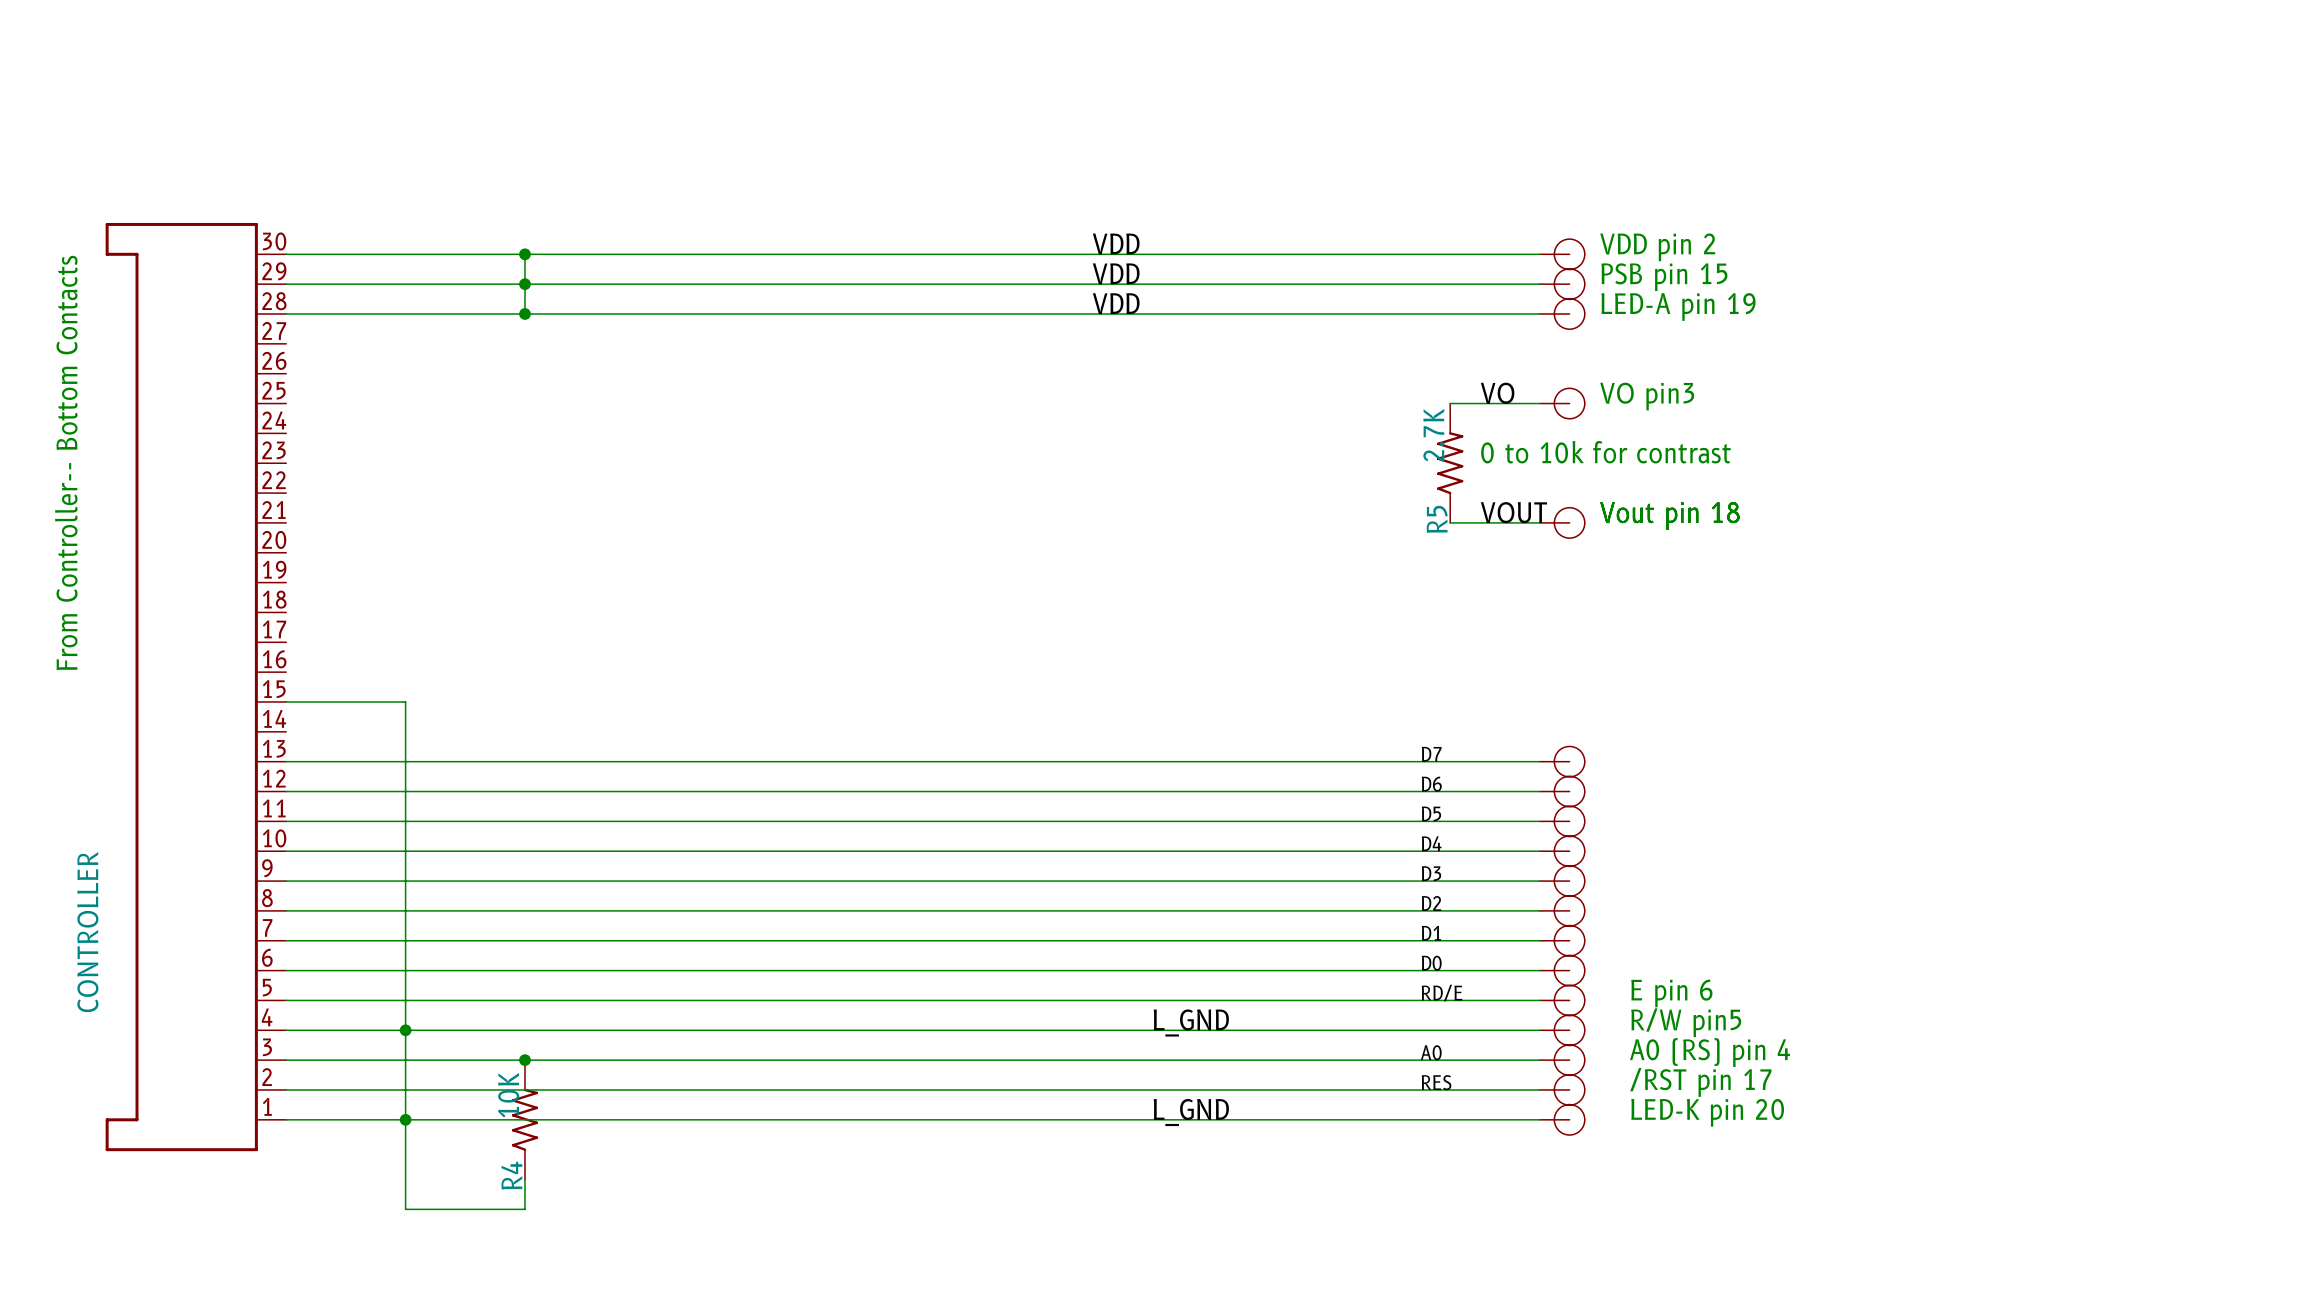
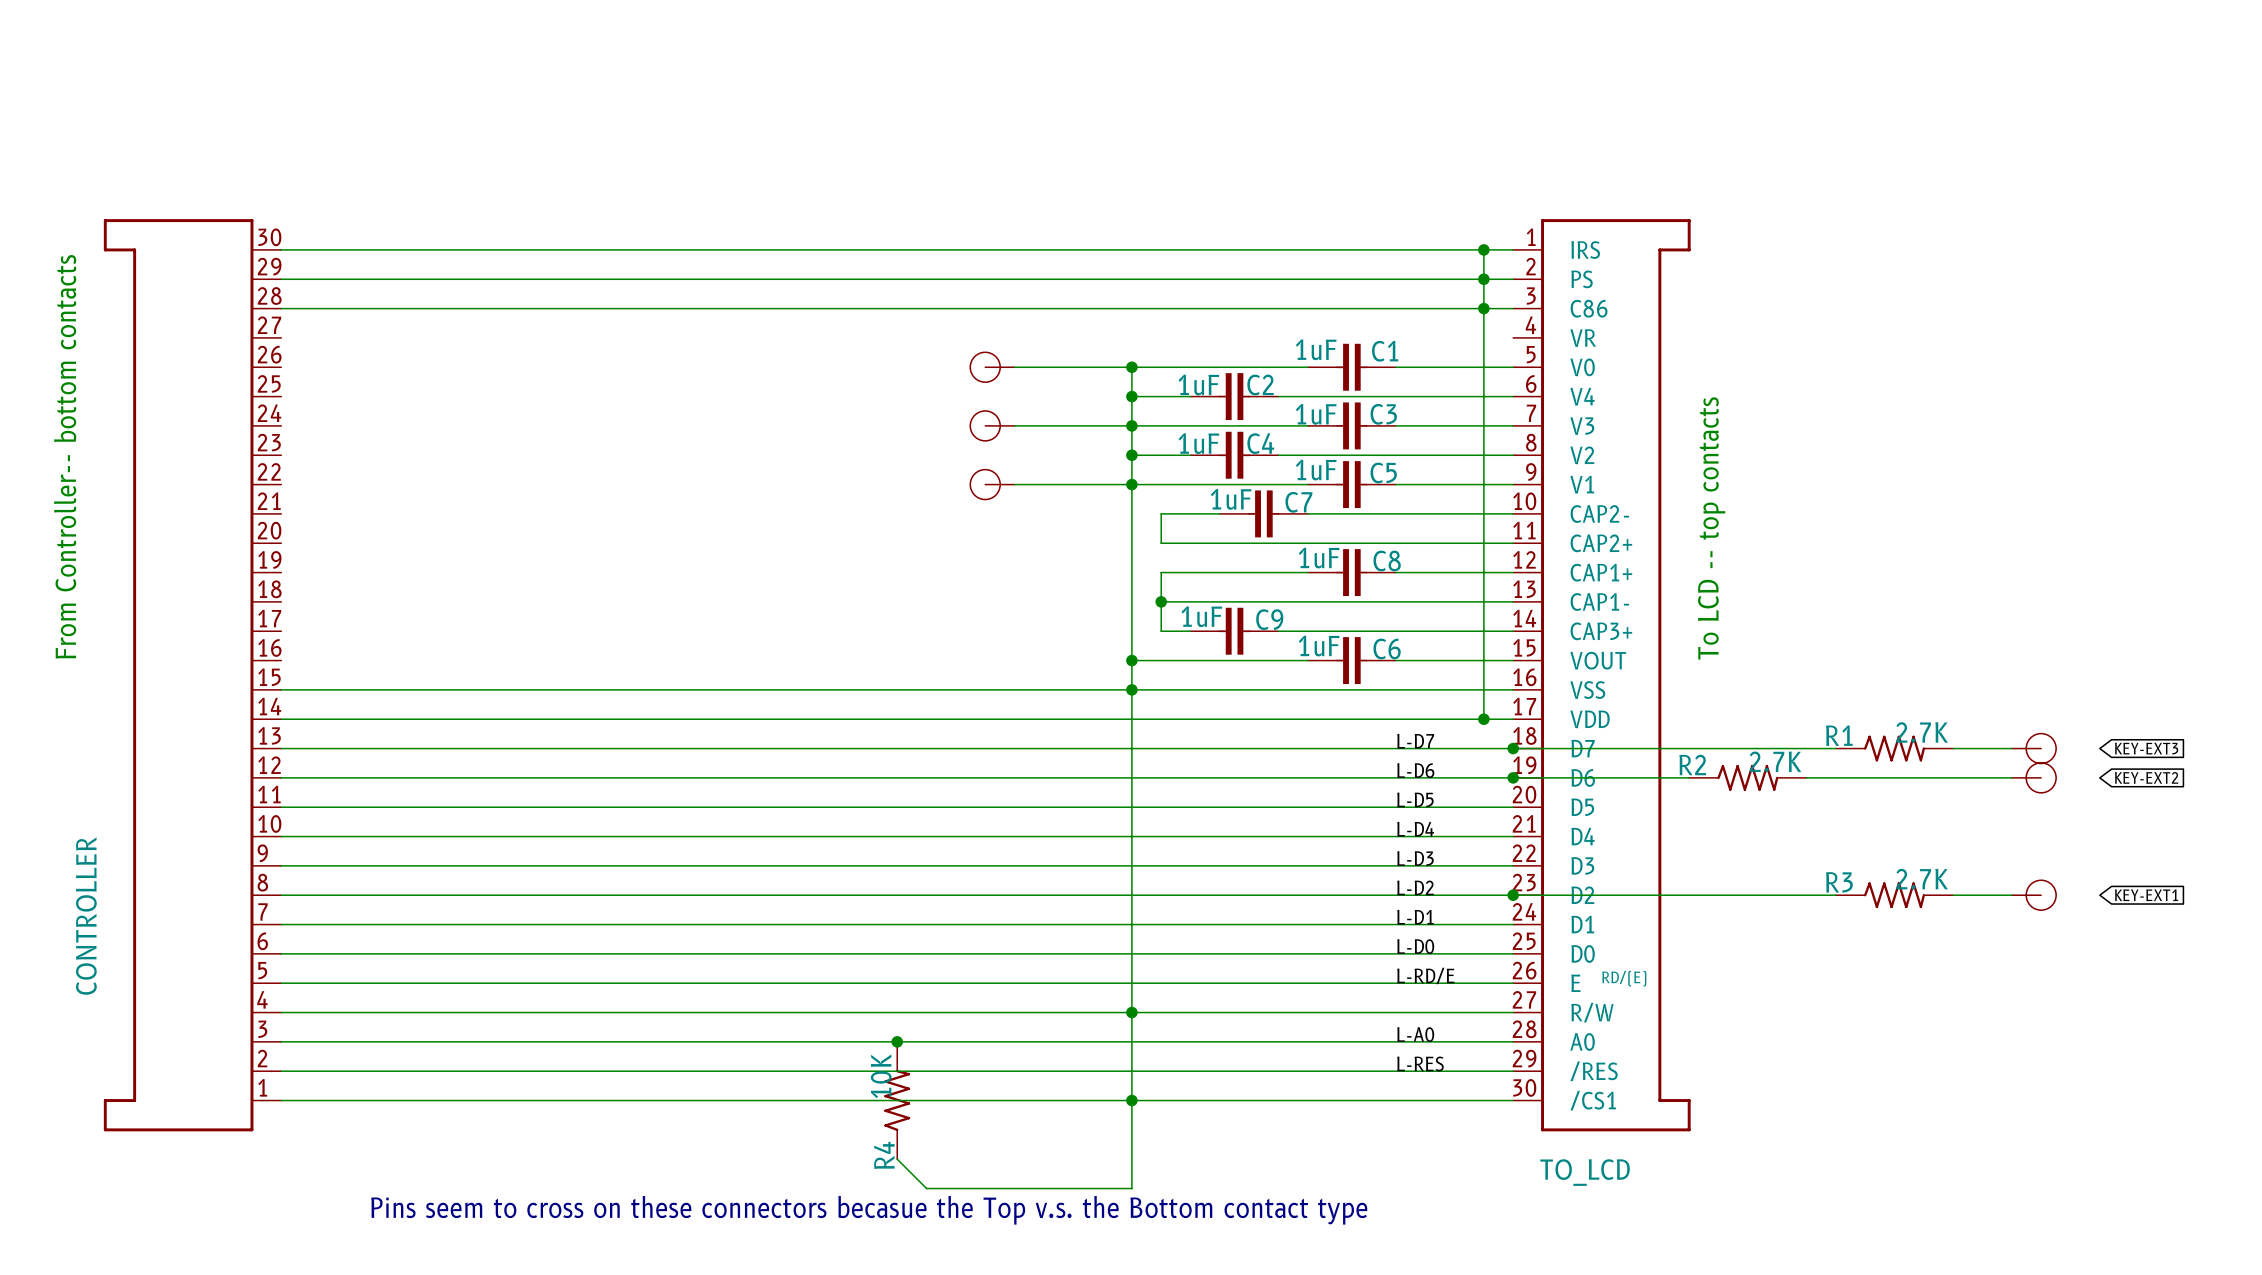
label: VDD (1116, 244) -> none
text: VDD pin 2 (1657, 247) -> none
wire: (524, 254) (524, 314) -> none
junction: (524, 254) -> none
wire: none -> (1483, 249) (1483, 719)
junction: none -> (1483, 249)
part: (1562, 254) -> none
label: VDD (1116, 273) -> none
text: PSB pin 15 (1664, 277) -> none
junction: (524, 284) -> none
junction: none -> (1483, 279)
part: (1562, 284) -> none
label: VDD (1116, 303) -> none
text: LED-A pin 19 (1678, 306) -> none
junction: (524, 314) -> none
junction: none -> (1483, 308)
part: (1562, 314) -> none
part: none -> (992, 367)
wire: none -> (1014, 367) (1307, 367)
wire: none -> (1131, 367) (1131, 1188) (926, 1188) (897, 1159)
junction: none -> (1131, 367)
C1: none -> 1uF (1351, 367)
wire: none -> (1395, 367) (1513, 367)
label: VO (1497, 393) -> none
text: VO pin3 (1647, 396) -> none
wire: none -> (1131, 396) (1190, 396)
junction: none -> (1131, 396)
C2: none -> 1uF (1234, 396)
wire: none -> (1278, 396) (1425, 396)
part: (1562, 403) -> none
part: none -> (992, 425)
wire: none -> (1014, 425) (1307, 425)
junction: none -> (1131, 425)
C3: none -> 1uF (1351, 425)
wire: none -> (1395, 425) (1513, 425)
text: 0 to 10k for contrast (1605, 452) -> none
text: From Controller-- Bottom Contacts (66, 463) -> From Controller-- bottom contacts (65, 456)
wire: none -> (1131, 455) (1190, 455)
junction: none -> (1131, 455)
C4: none -> 1uF (1234, 455)
wire: none -> (1278, 455) (1513, 455)
R5: 2.7K (1450, 463) -> none
part: none -> (992, 484)
wire: none -> (1014, 484) (1307, 484)
junction: none -> (1131, 484)
C5: none -> 1uF (1351, 484)
wire: none -> (1395, 484) (1513, 484)
label: VOUT (1513, 512) -> none
text: Vout pin 18 (1669, 515) -> none
wire: none -> (1219, 513) (1161, 513) (1161, 543) (1513, 543)
C7: none -> 1uF (1263, 513)
wire: none -> (1307, 513) (1425, 513)
part: (1562, 522) -> none
text: none -> To LCD -- top contacts (1711, 528)
wire: none -> (1307, 572) (1161, 572) (1161, 631) (1190, 631)
C8: none -> 1uF (1351, 572)
wire: none -> (1395, 572) (1513, 572)
wire: none -> (1161, 601) (1513, 601)
junction: none -> (1161, 601)
C9: none -> 1uF (1234, 631)
wire: none -> (1278, 631) (1513, 631)
wire: none -> (1131, 660) (1307, 660)
junction: none -> (1131, 660)
C6: none -> 1uF (1351, 660)
wire: none -> (1395, 660) (1513, 660)
TO_LCD: none -> (1601, 675)
wire: (405, 701) (405, 1209) (524, 1209) (524, 1179) -> (398, 689) (1513, 689)
junction: none -> (1131, 689)
wire: none -> (281, 719) (1513, 719)
junction: none -> (1483, 719)
label: D7 (1431, 754) -> L-D7 (1415, 741)
wire: none -> (1513, 748) (1835, 748)
junction: none -> (1513, 748)
part: (1562, 761) -> none
R1: none -> 2.7K (1894, 748)
wire: none -> (1953, 748) (2011, 748)
part: none -> (2034, 748)
global label: none -> KEY-EXT3 (2146, 748)
label: D6 (1431, 784) -> L-D6 (1415, 770)
wire: none -> (1513, 777) (1689, 777)
junction: none -> (1513, 777)
part: (1562, 791) -> none
R2: none -> 2.7K (1747, 777)
wire: none -> (1806, 777) (2011, 777)
part: none -> (2034, 777)
global label: none -> KEY-EXT2 (2146, 777)
label: D5 (1431, 813) -> L-D5 (1415, 799)
part: (1562, 821) -> none
label: D4 (1431, 843) -> L-D4 (1415, 829)
part: (1562, 851) -> none
label: D3 (1431, 873) -> L-D3 (1415, 858)
part: (1562, 881) -> none
label: D2 (1431, 903) -> L-D2 (1415, 887)
wire: none -> (1513, 895) (1835, 895)
junction: none -> (1513, 895)
part: (1562, 910) -> none
R3: none -> 2.7K (1894, 895)
wire: none -> (1953, 895) (2011, 895)
part: none -> (2034, 895)
global label: none -> KEY-EXT1 (2146, 895)
label: D1 (1431, 933) -> L-D1 (1415, 917)
part: (1562, 940) -> none
label: D0 (1431, 963) -> L-D0 (1415, 946)
part: (1562, 970) -> none
label: RD/E (1441, 993) -> L-RD/E (1425, 975)
text: E pin 6 (1671, 993) -> RD/(E) (1624, 978)
part: (1562, 1000) -> none
label: L_GND (1191, 1022) -> none
text: R/W pin5 (1686, 1022) -> none
junction: (405, 1030) -> none
junction: none -> (1131, 1012)
part: (1562, 1030) -> none
label: A0 (1431, 1052) -> L-A0 (1415, 1034)
text: A0 (RS) pin 4 (1710, 1052) -> none
junction: (524, 1060) -> none
junction: none -> (897, 1041)
part: (1562, 1060) -> none
label: RES (1436, 1082) -> L-RES (1420, 1063)
text: /RST pin 17 (1700, 1082) -> none
part: (1562, 1089) -> none
label: L_GND (1191, 1112) -> none
text: LED-K pin 20 (1707, 1112) -> none
junction: (405, 1119) -> none
R4 position: (524, 1119) -> (897, 1100)
junction: none -> (1131, 1100)
part: (1562, 1119) -> none
text: none -> Pins seem to cross on these connectors becasue the Top v.s. the Bottom contact type (869, 1210)

